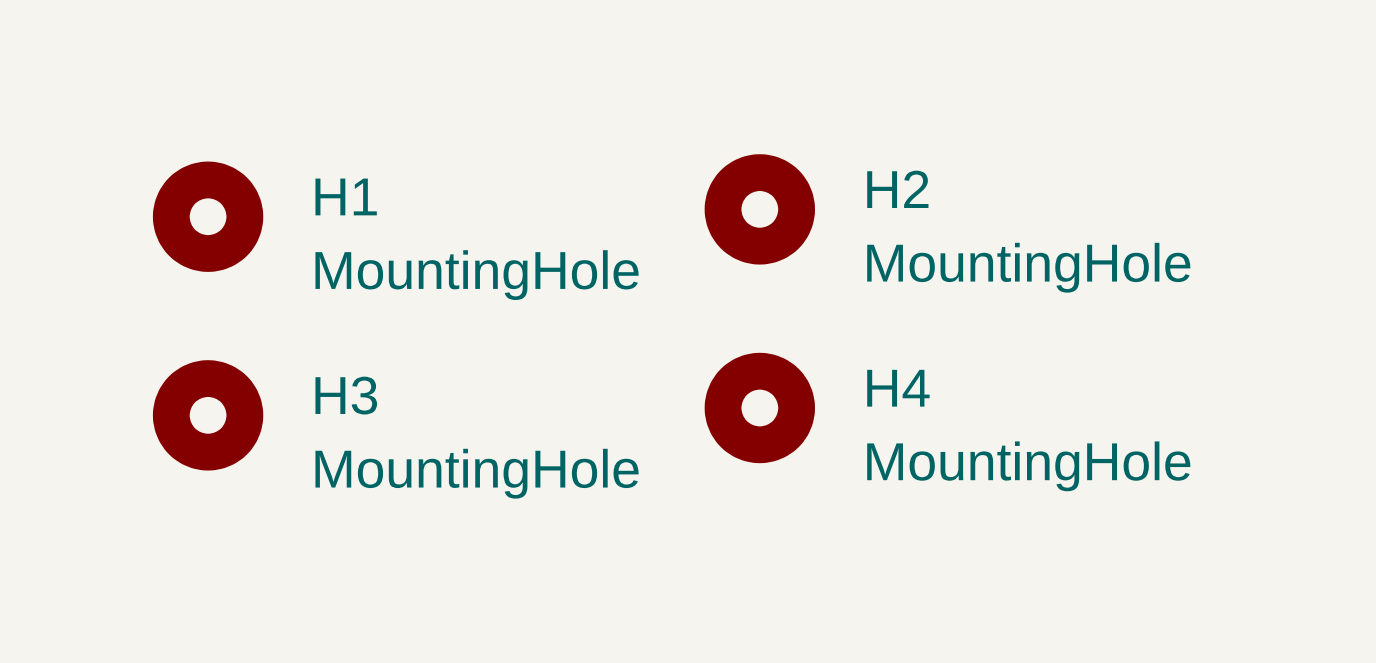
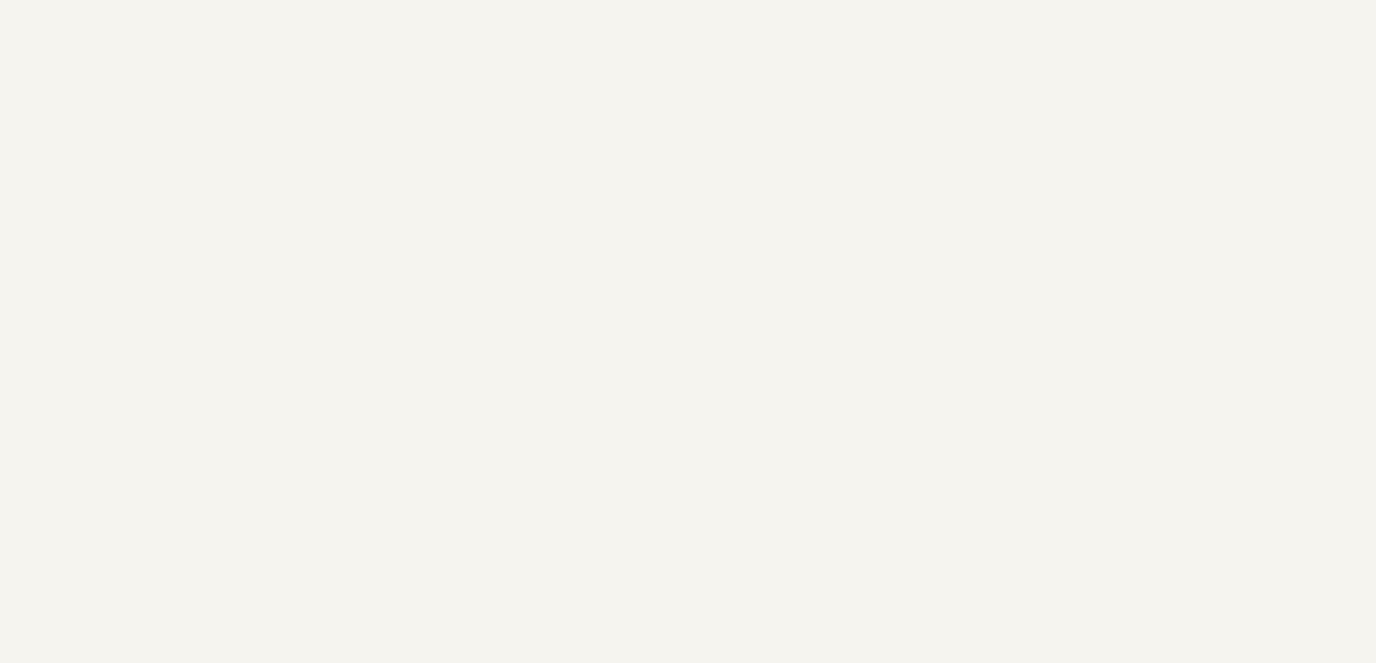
H2: MountingHole (759, 209) -> none
H1: MountingHole (208, 216) -> none
H4: MountingHole (759, 407) -> none
H3: MountingHole (208, 415) -> none

